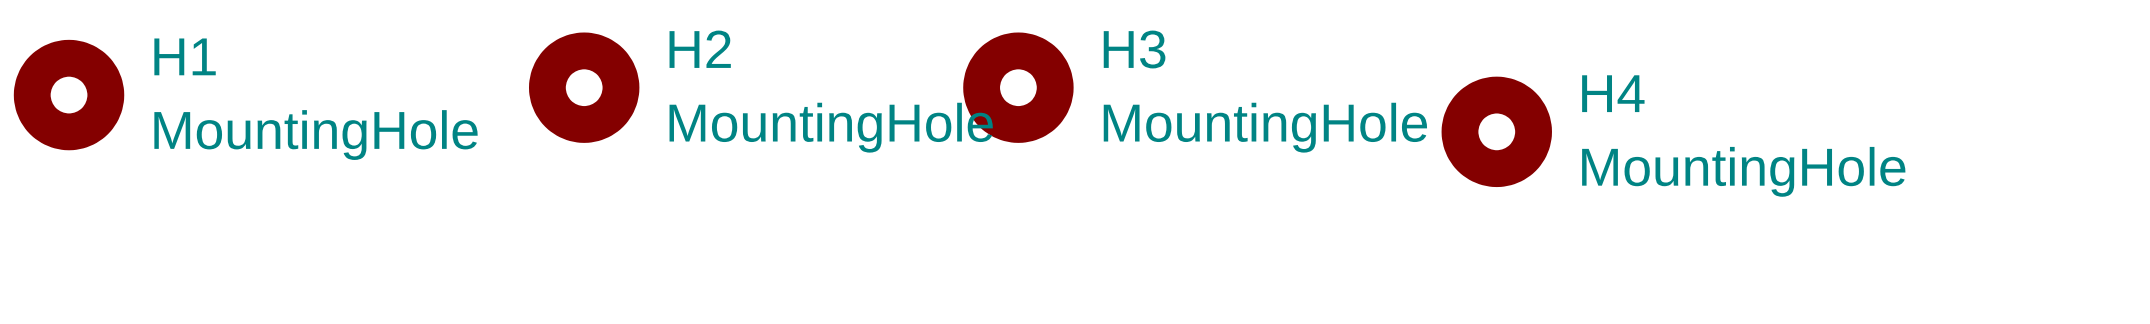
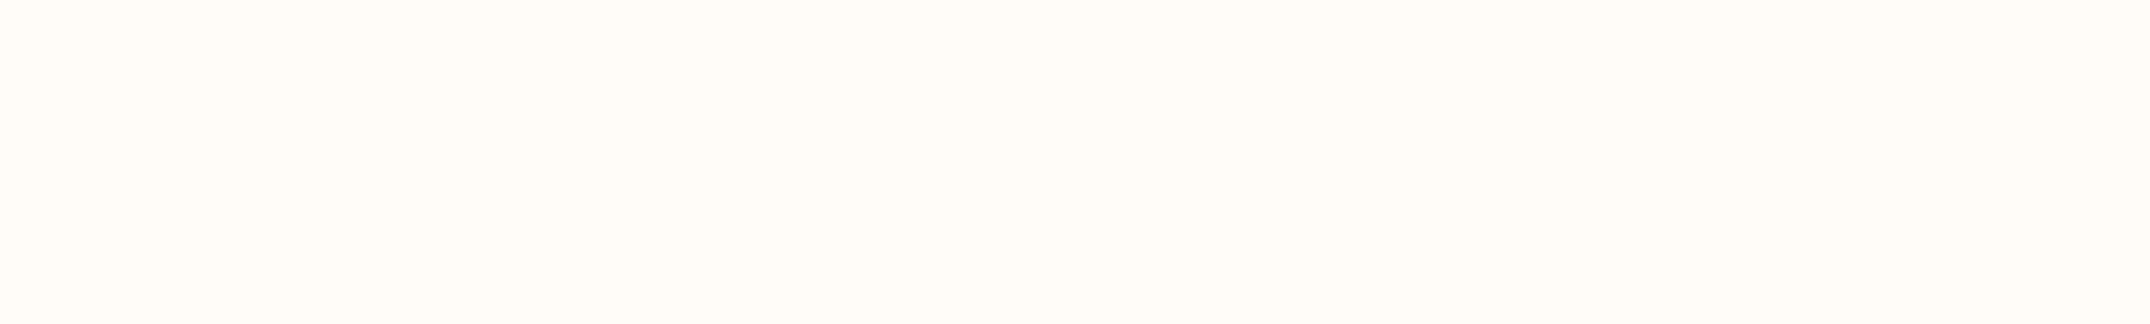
H2: MountingHole (584, 87) -> none
H3: MountingHole (1018, 87) -> none
H1: MountingHole (69, 95) -> none
H4: MountingHole (1496, 131) -> none

